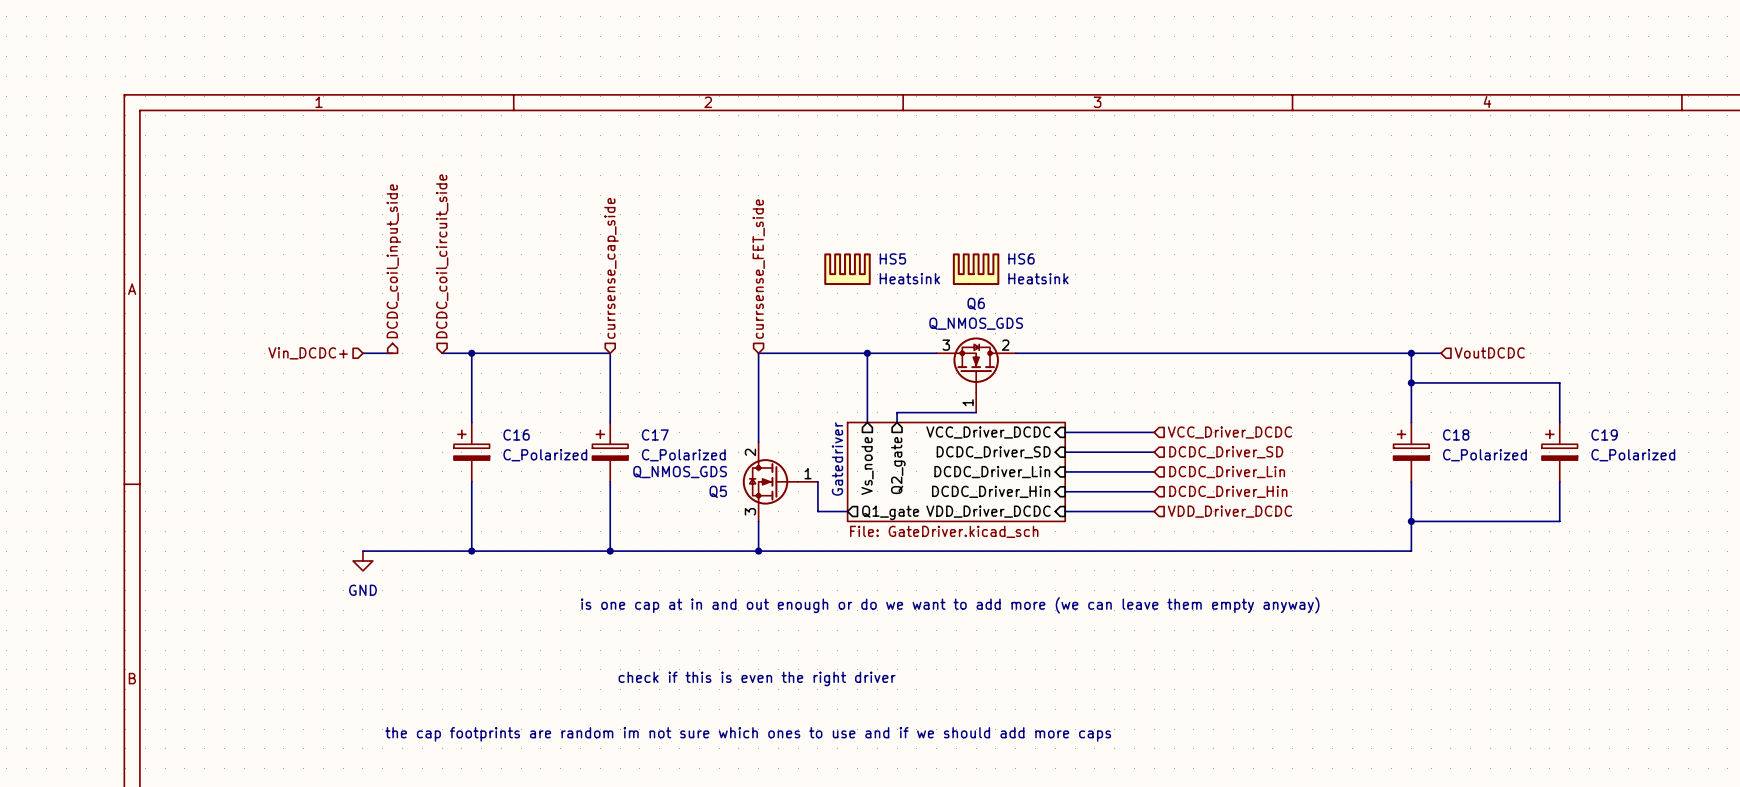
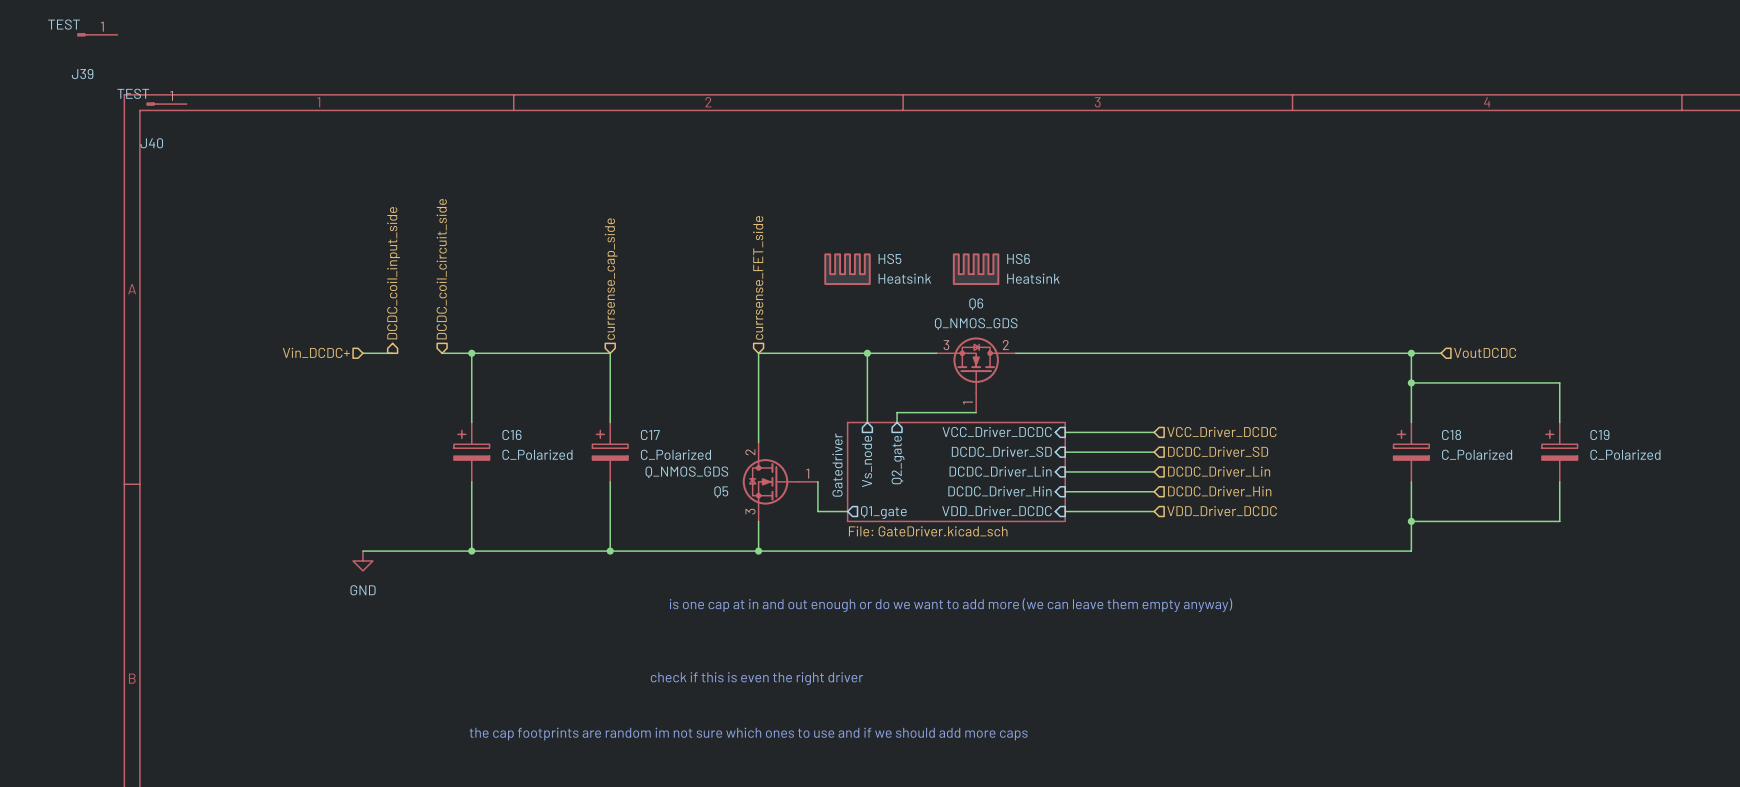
J39: none -> TEST (97, 34)
J40: none -> TEST (166, 104)

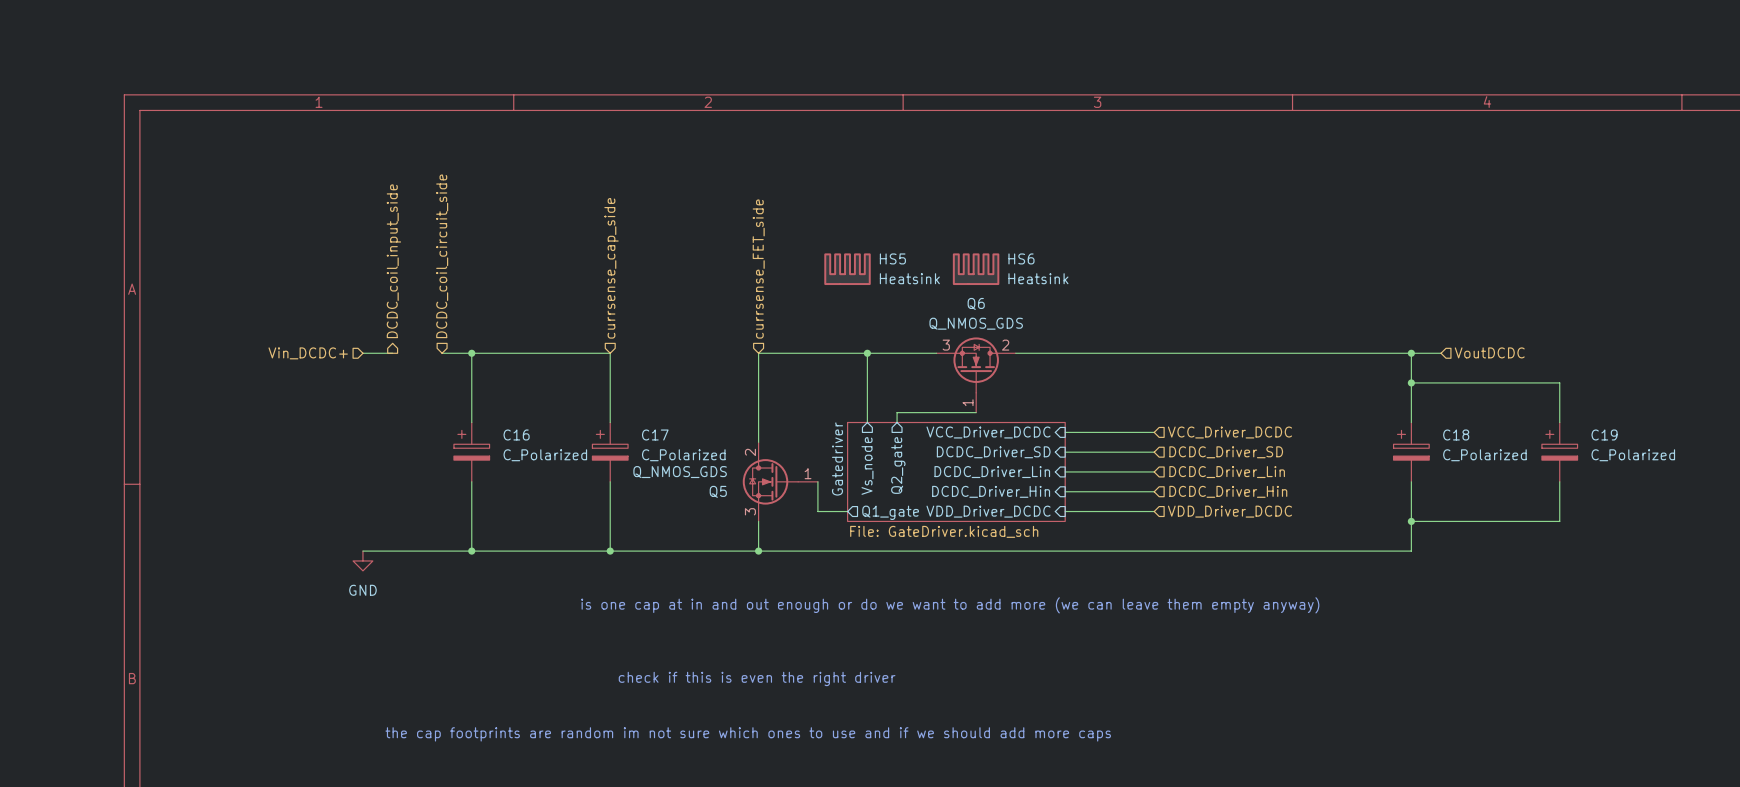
J39: TEST (97, 34) -> none
J40: TEST (166, 104) -> none

